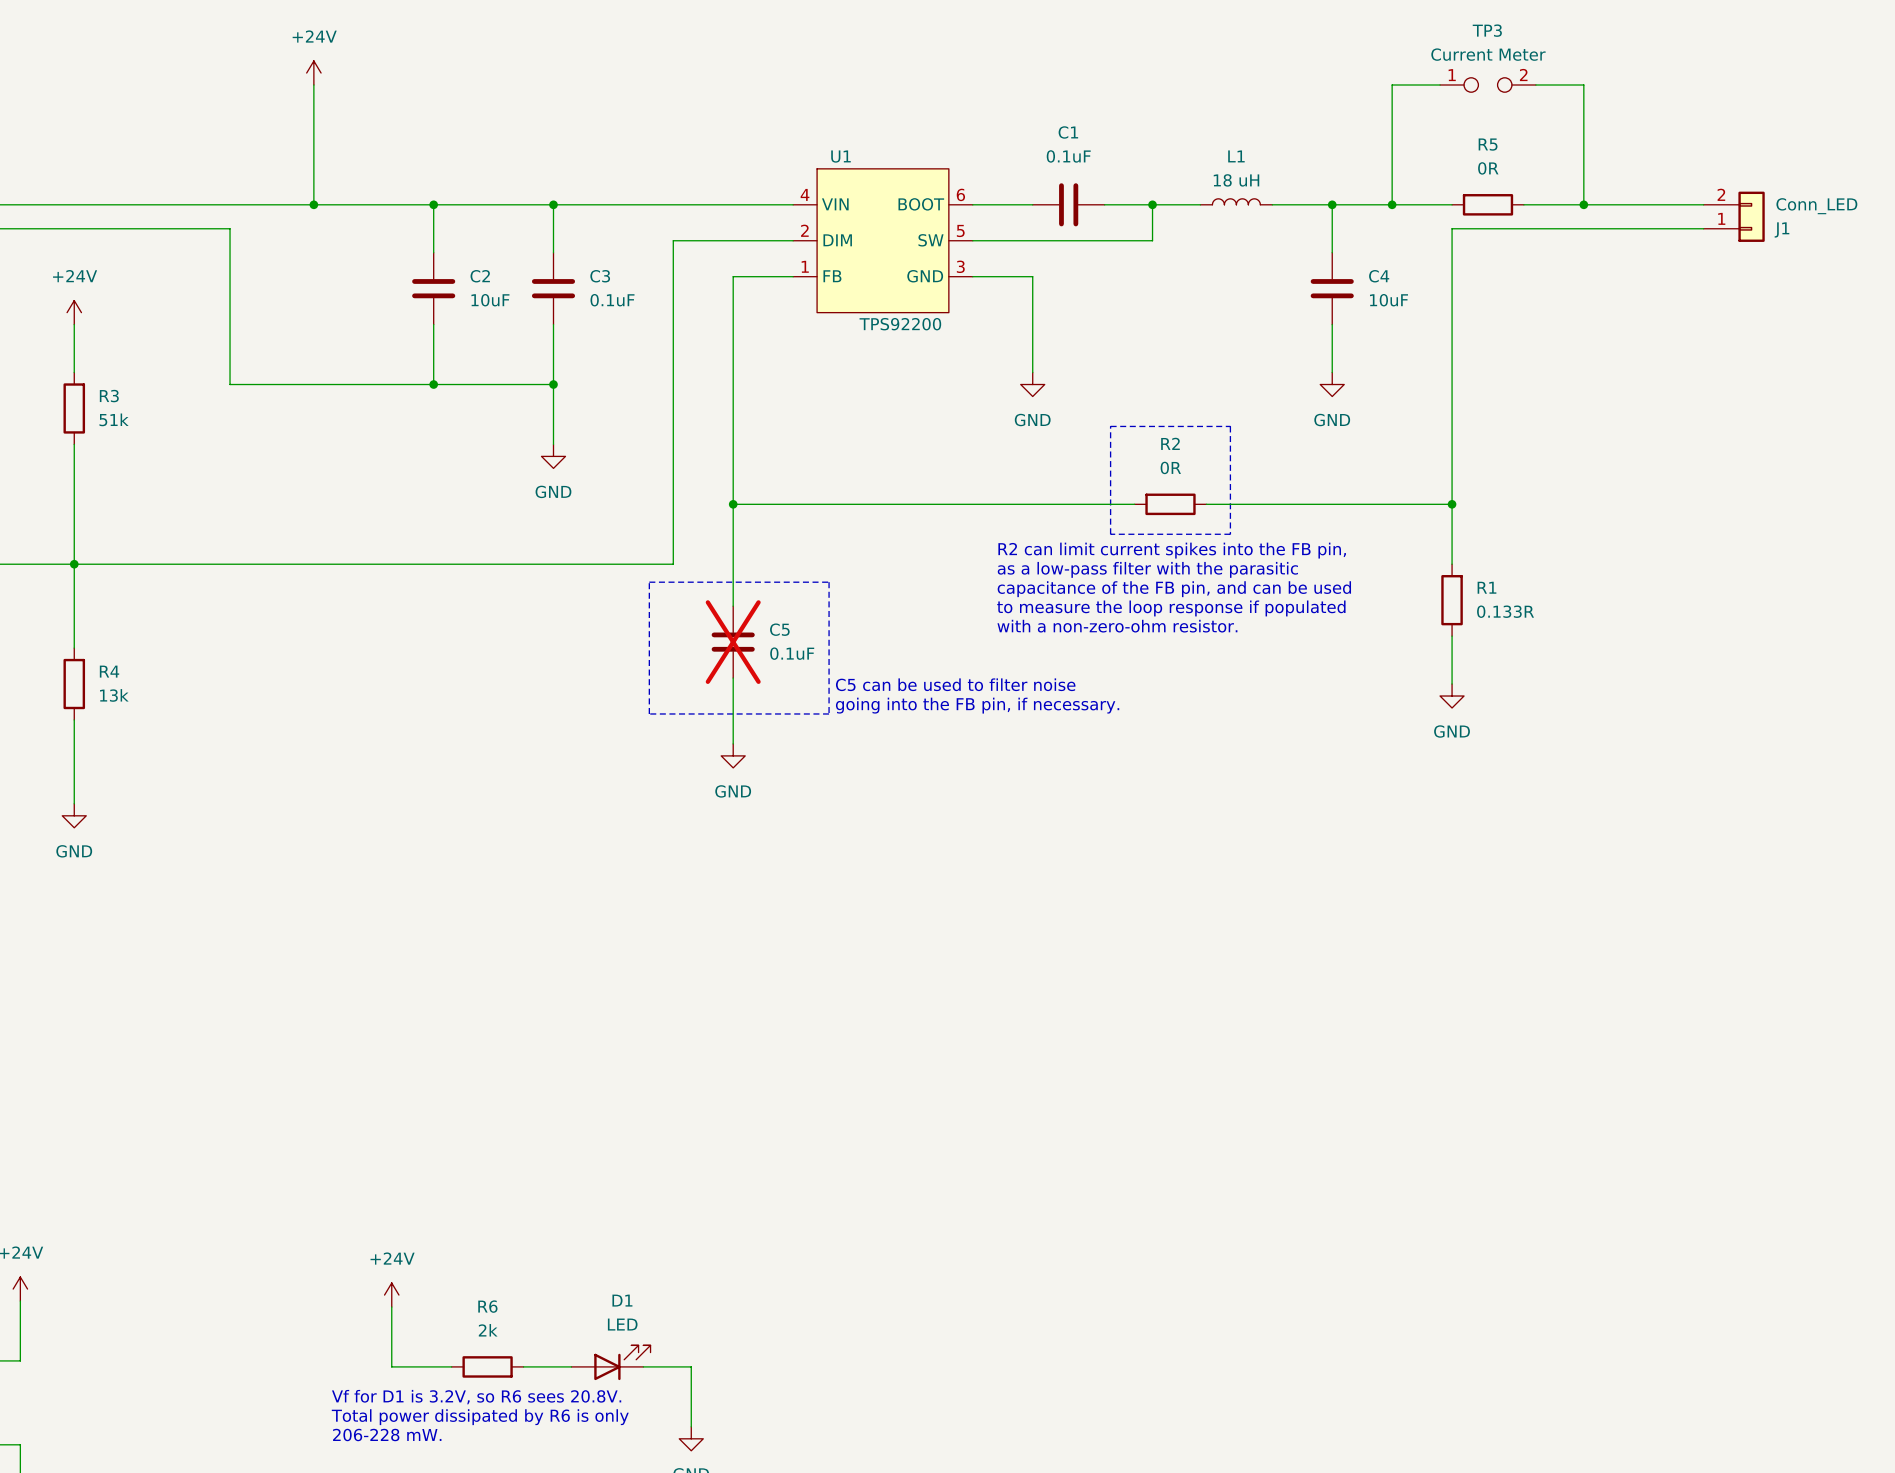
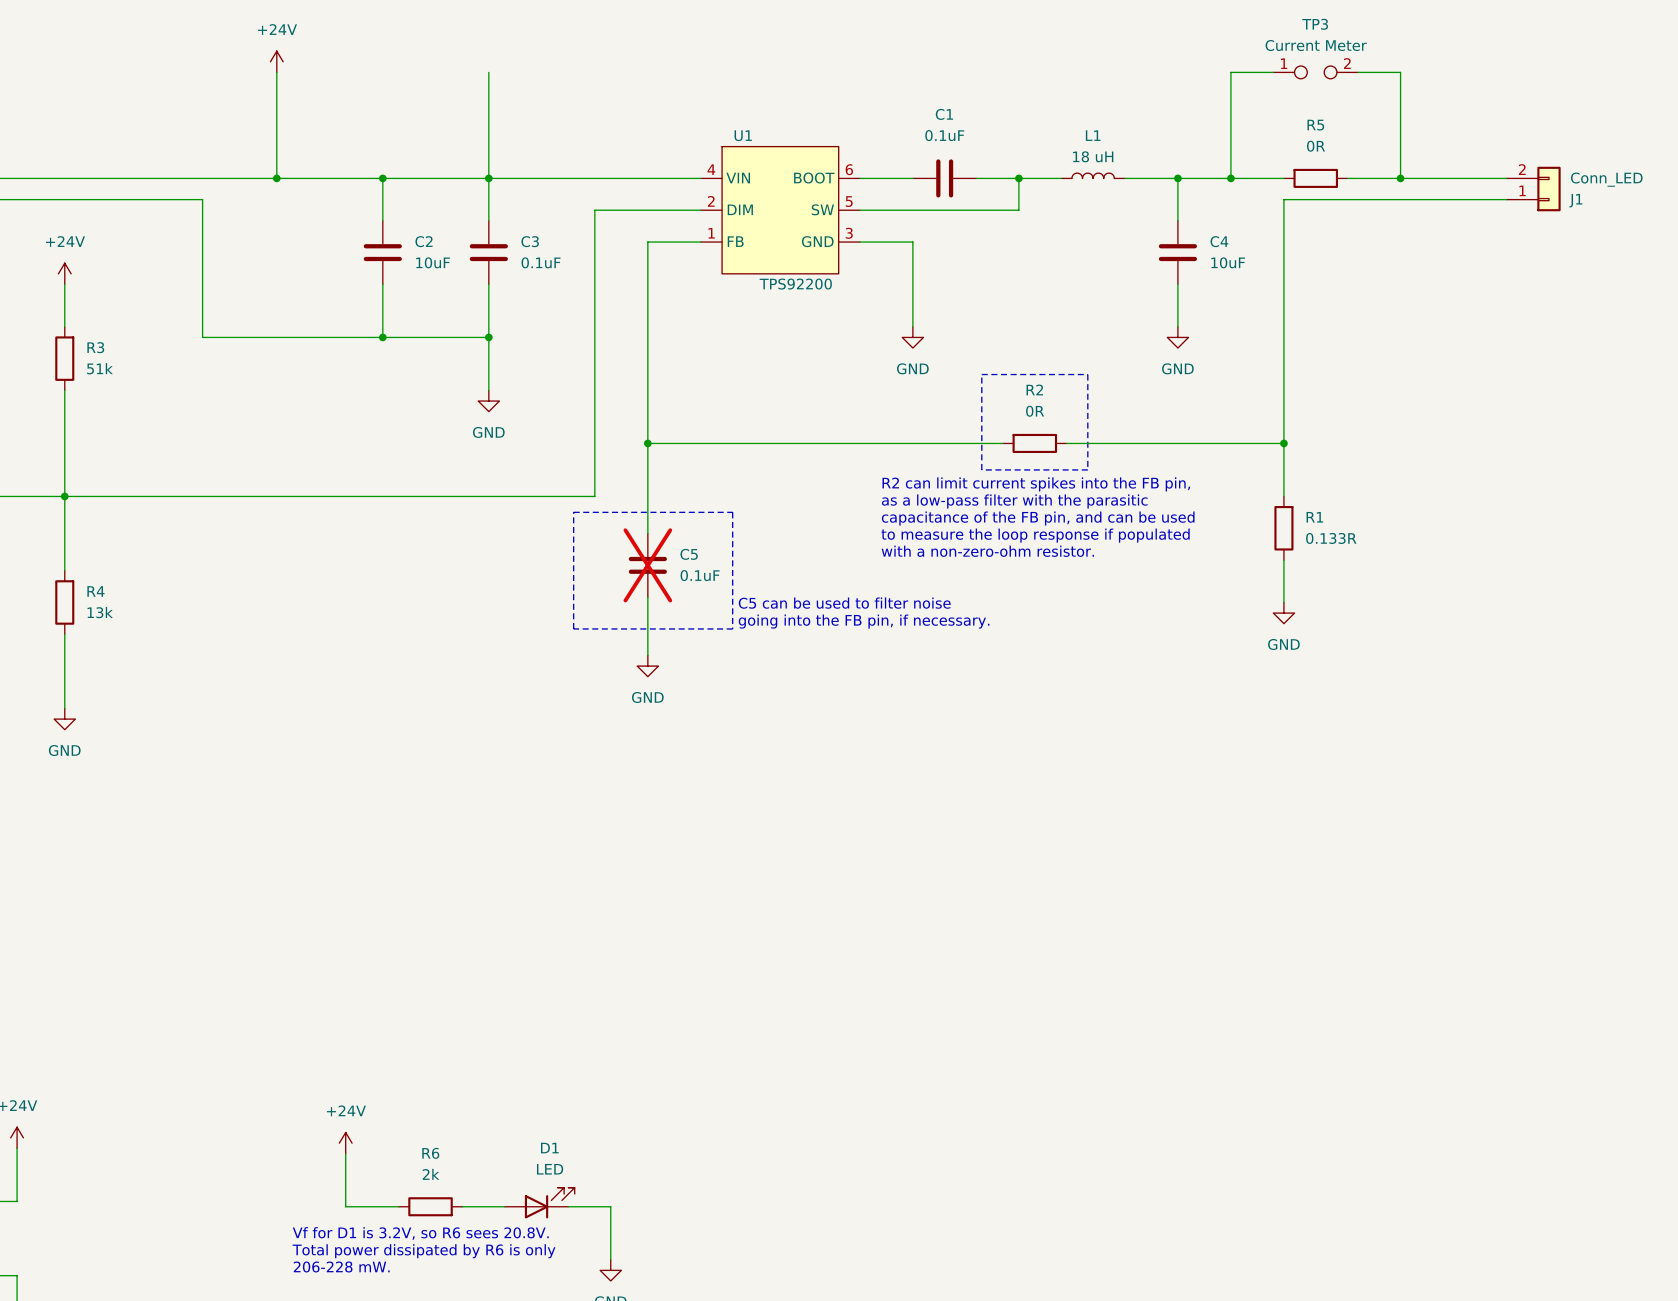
wire: none -> (488, 72) (488, 178)

